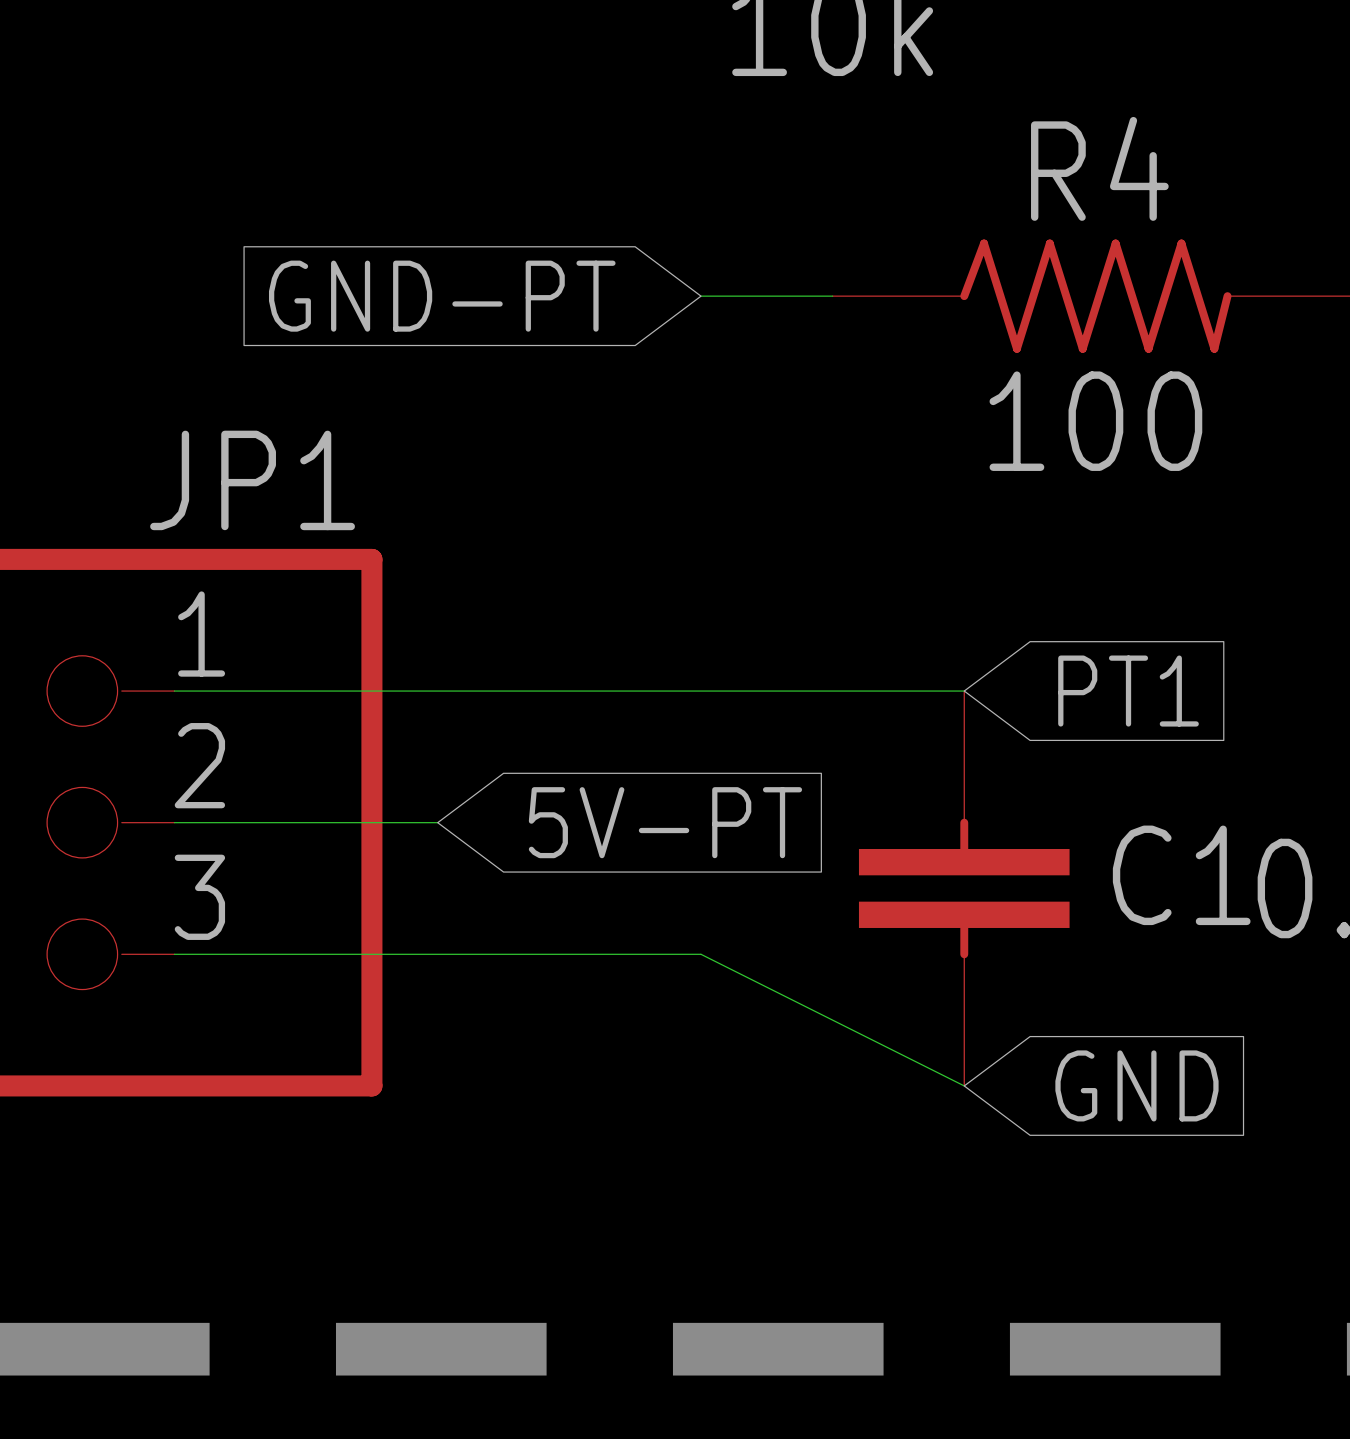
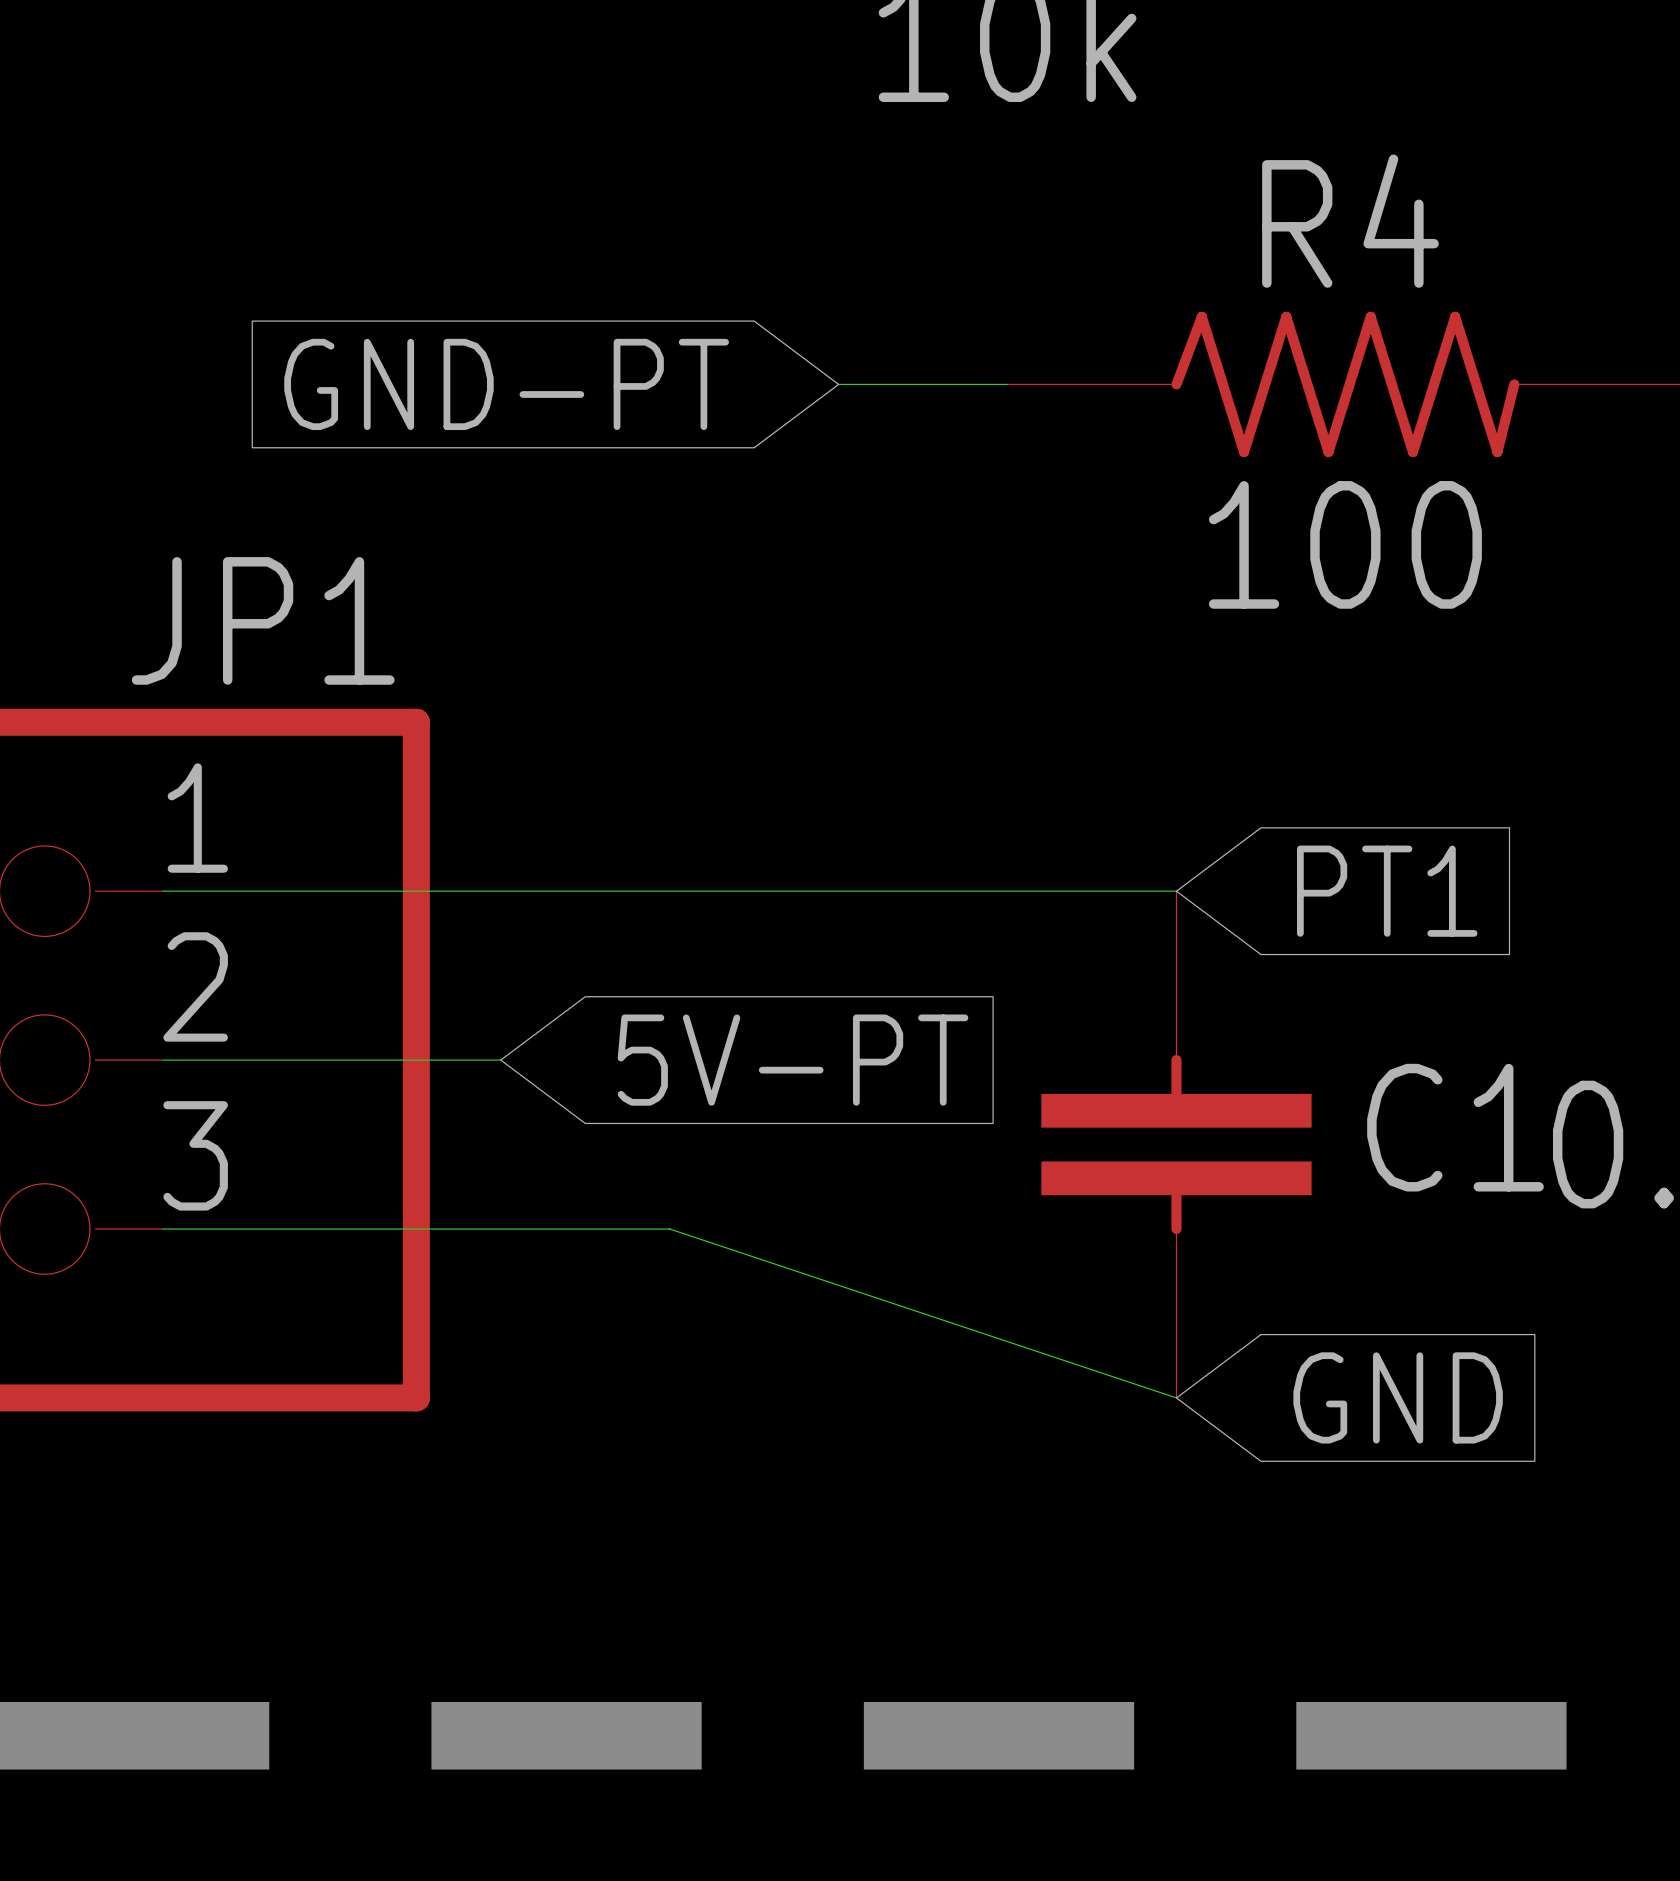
wire: (569, 954) (701, 954) (964, 1085) -> (669, 1229) (1176, 1397)

